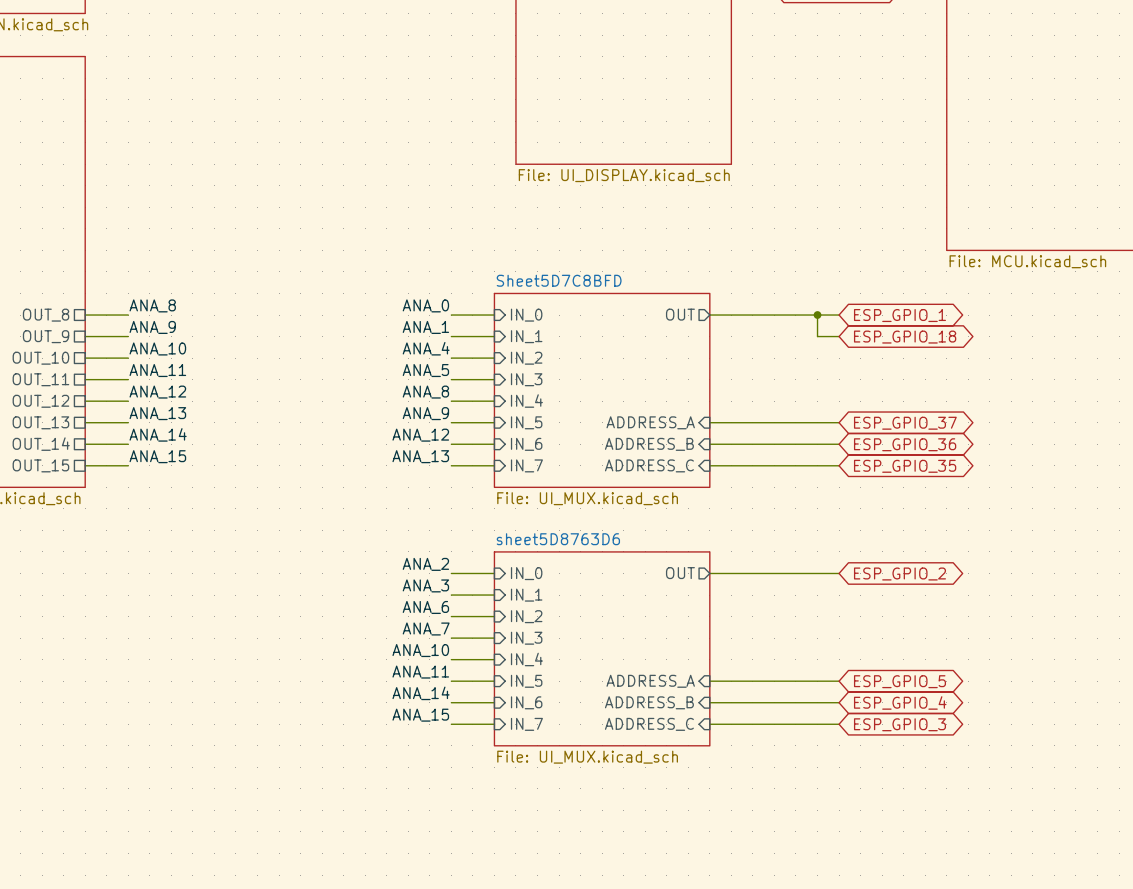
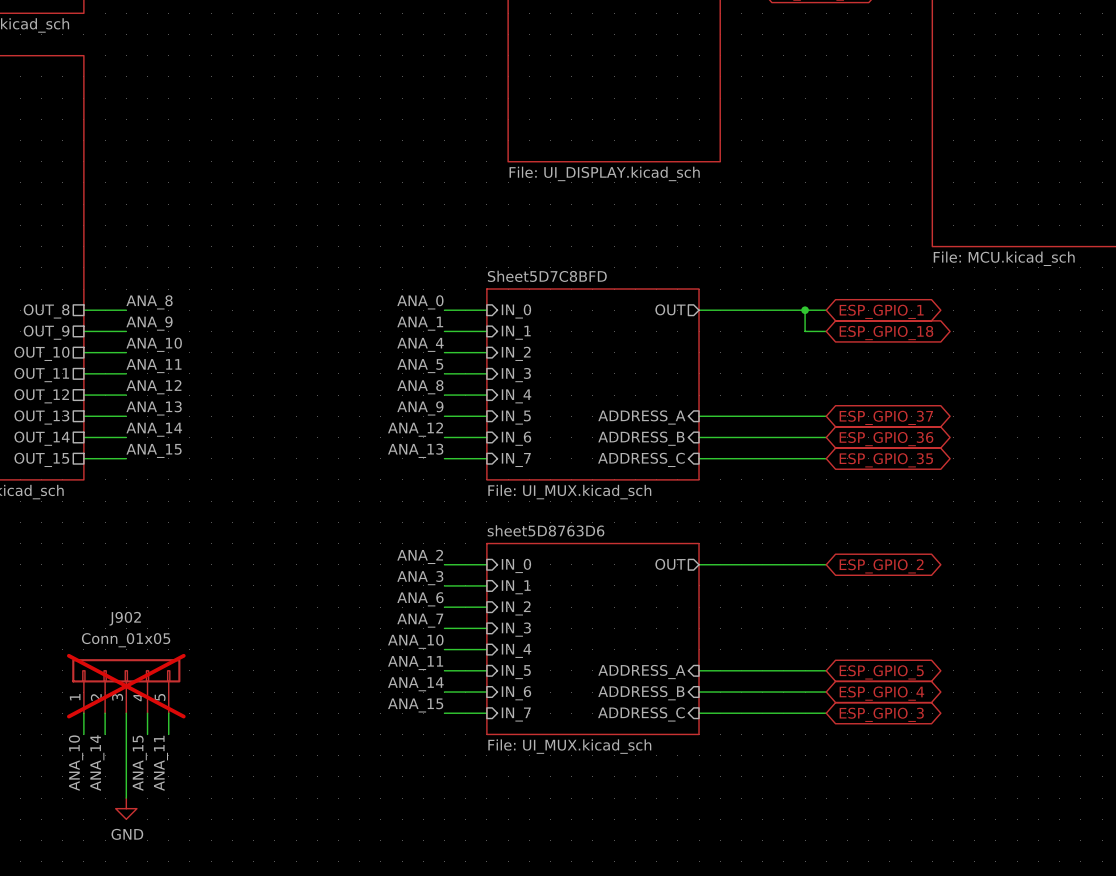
J902: none -> Conn_01x05 (126, 686)
wire: none -> (83, 713) (83, 734)
wire: none -> (105, 713) (105, 734)
wire: none -> (126, 713) (126, 798)
wire: none -> (147, 713) (147, 734)
wire: none -> (168, 713) (168, 734)
label: none -> ANA_10 (76, 763)
label: none -> ANA_14 (97, 763)
label: none -> ANA_15 (139, 763)
label: none -> ANA_11 (160, 763)
power symbol: none -> GND (126, 808)

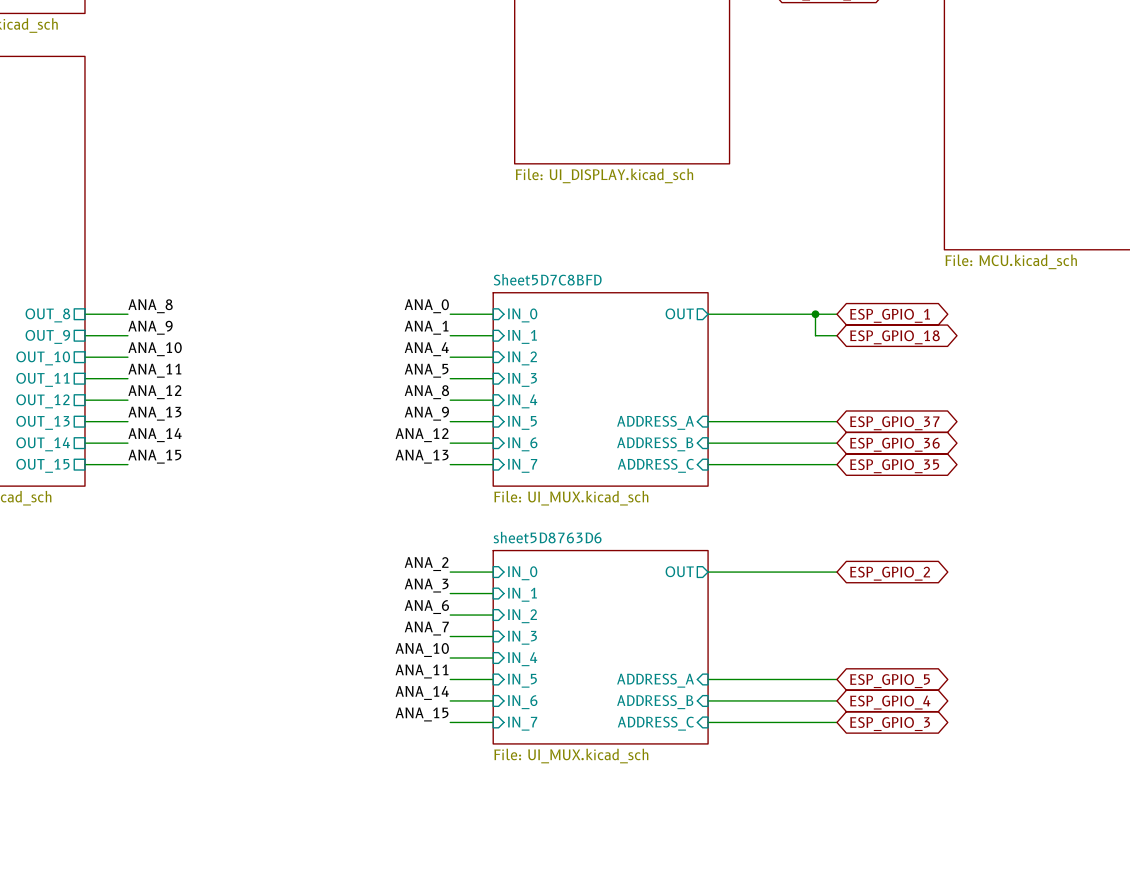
J902: Conn_01x05 (126, 686) -> none
wire: (83, 713) (83, 734) -> none
wire: (105, 713) (105, 734) -> none
wire: (126, 713) (126, 798) -> none
wire: (147, 713) (147, 734) -> none
wire: (168, 713) (168, 734) -> none
label: ANA_10 (76, 763) -> none
label: ANA_14 (97, 763) -> none
label: ANA_15 (139, 763) -> none
label: ANA_11 (160, 763) -> none
power symbol: GND (126, 808) -> none

